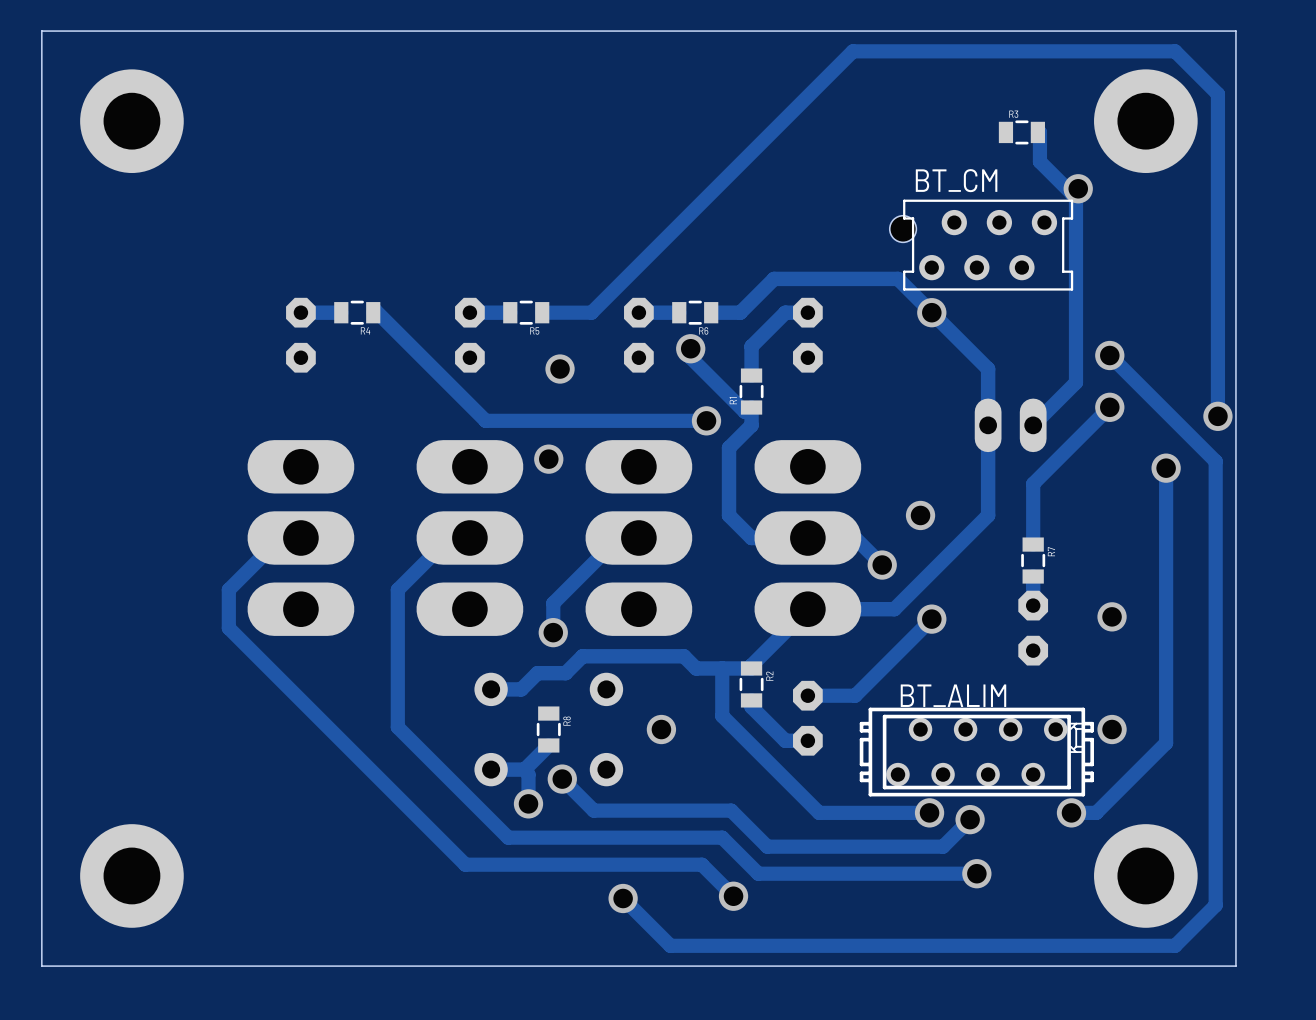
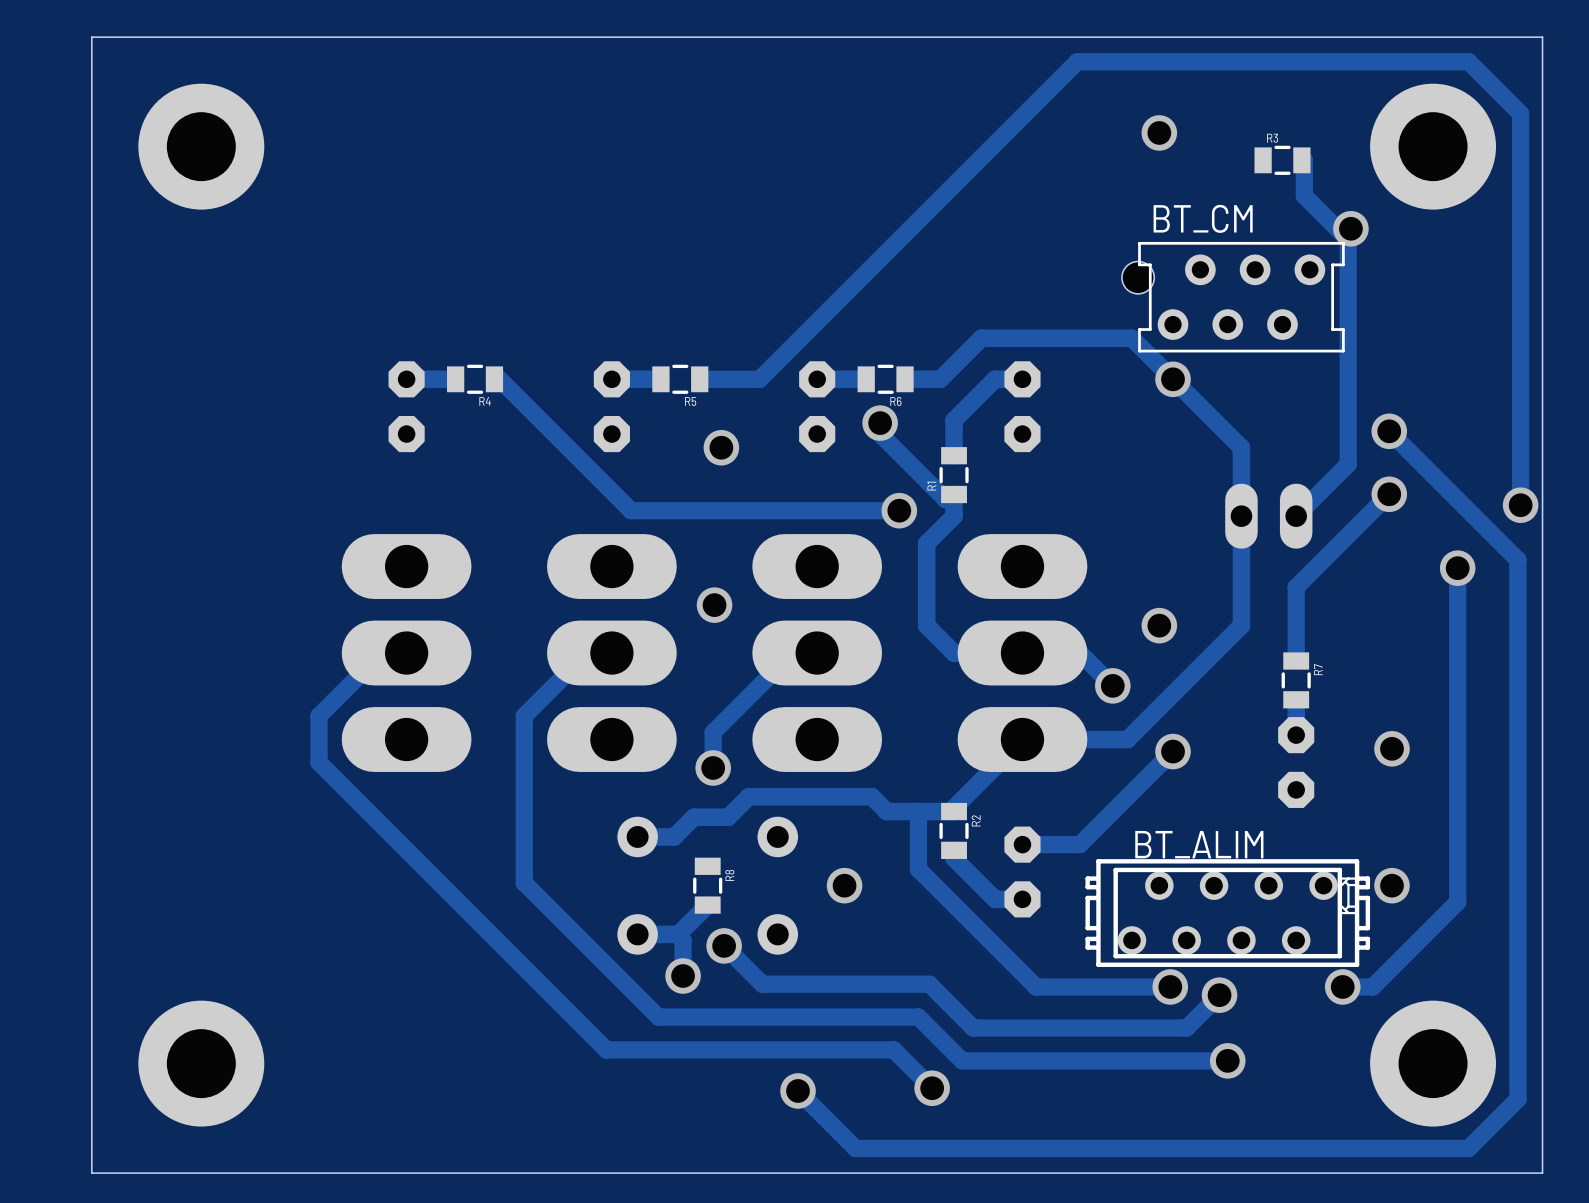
via: none -> (1159, 132)
via position: (548, 459) -> (714, 605)

